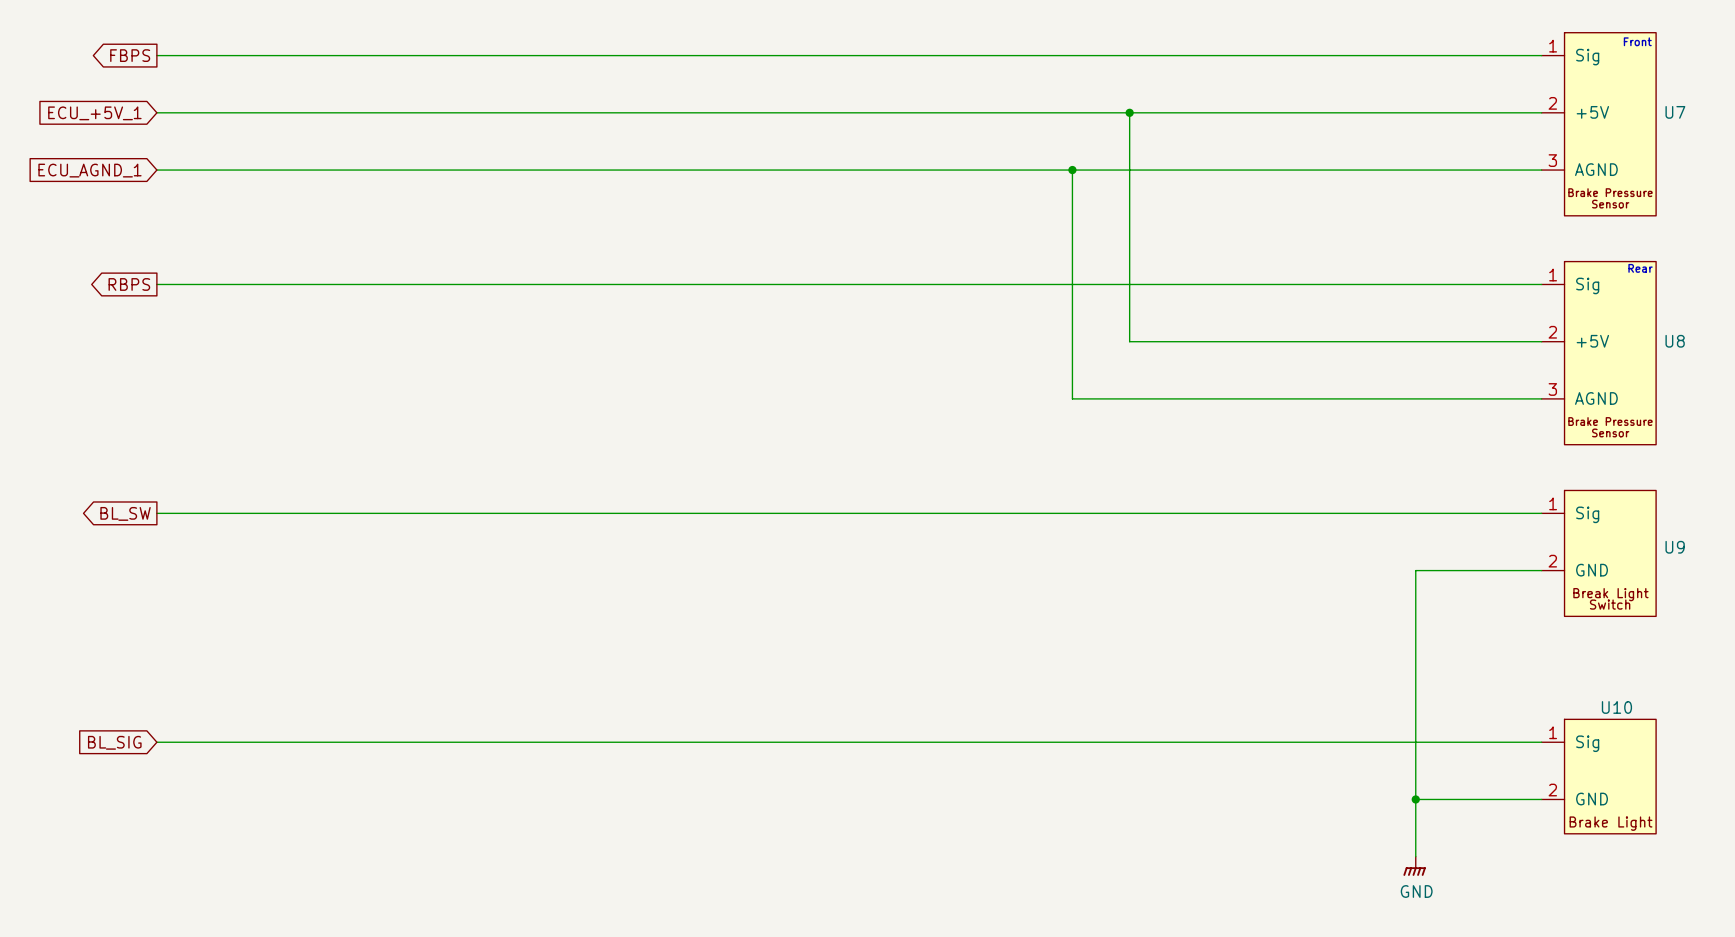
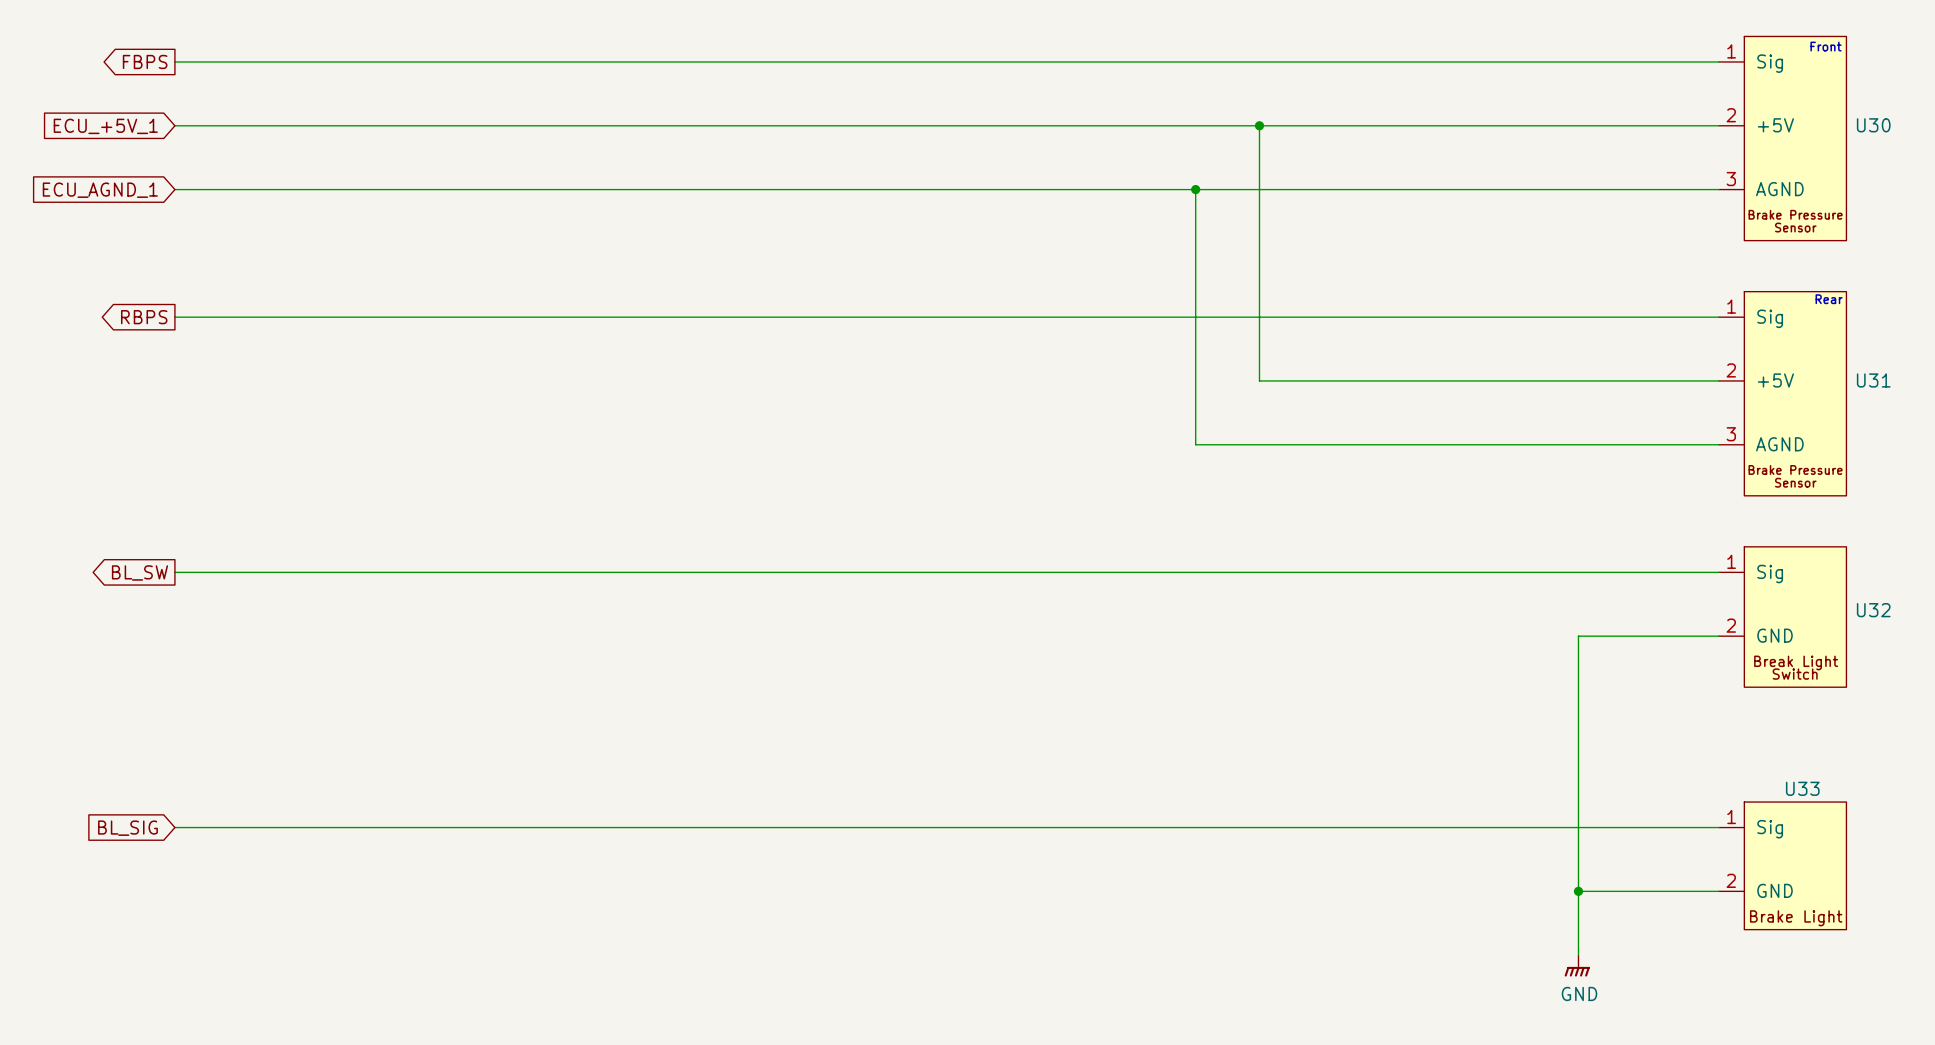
U7 name: U7 (1675, 112) -> U30 (1873, 125)
U8 name: U8 (1675, 341) -> U31 (1873, 380)
U9 name: U9 (1675, 547) -> U32 (1873, 610)
U10 name: U10 (1616, 707) -> U33 (1802, 788)

